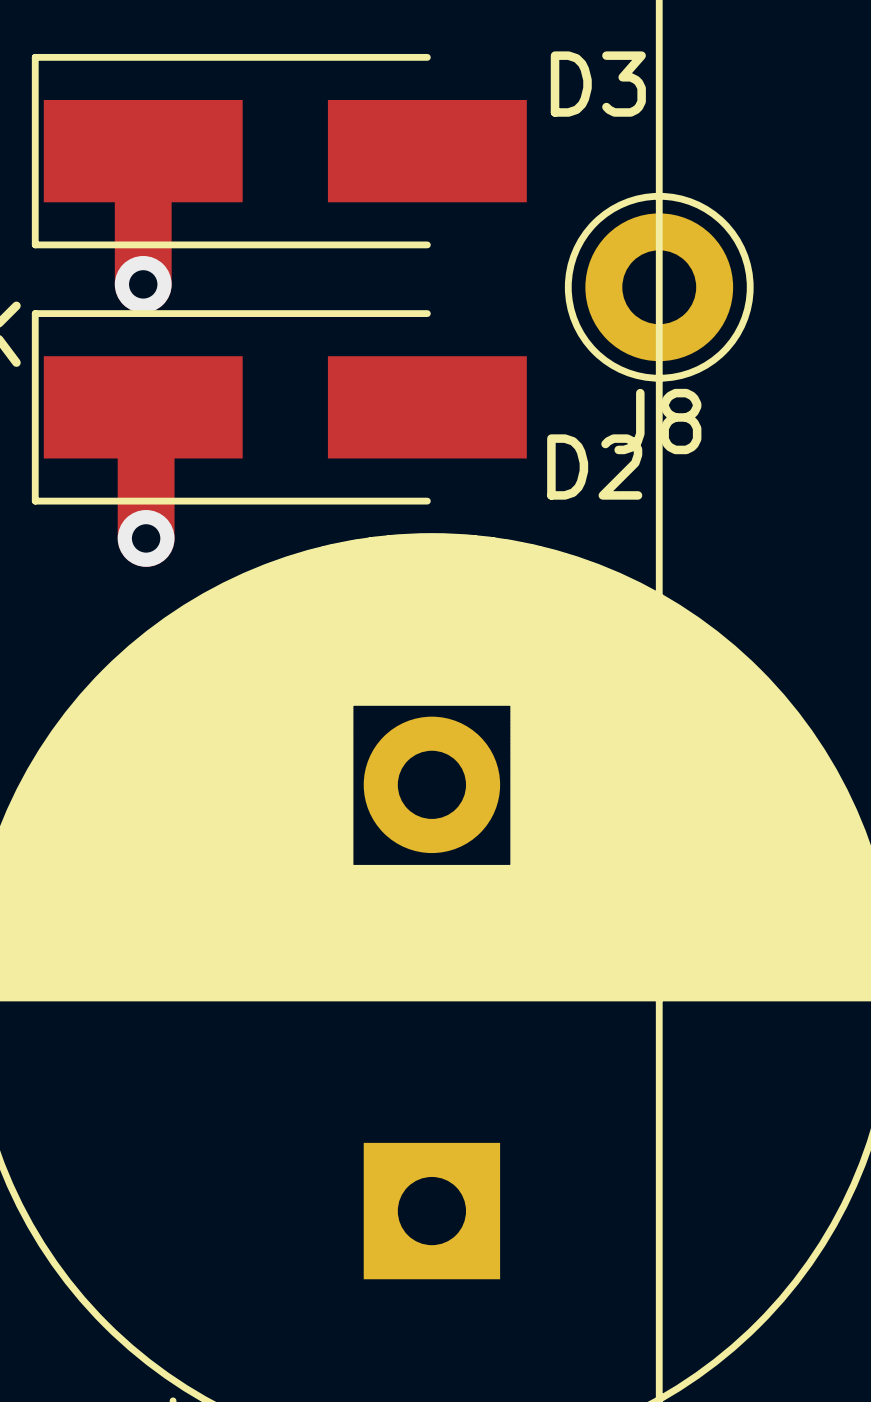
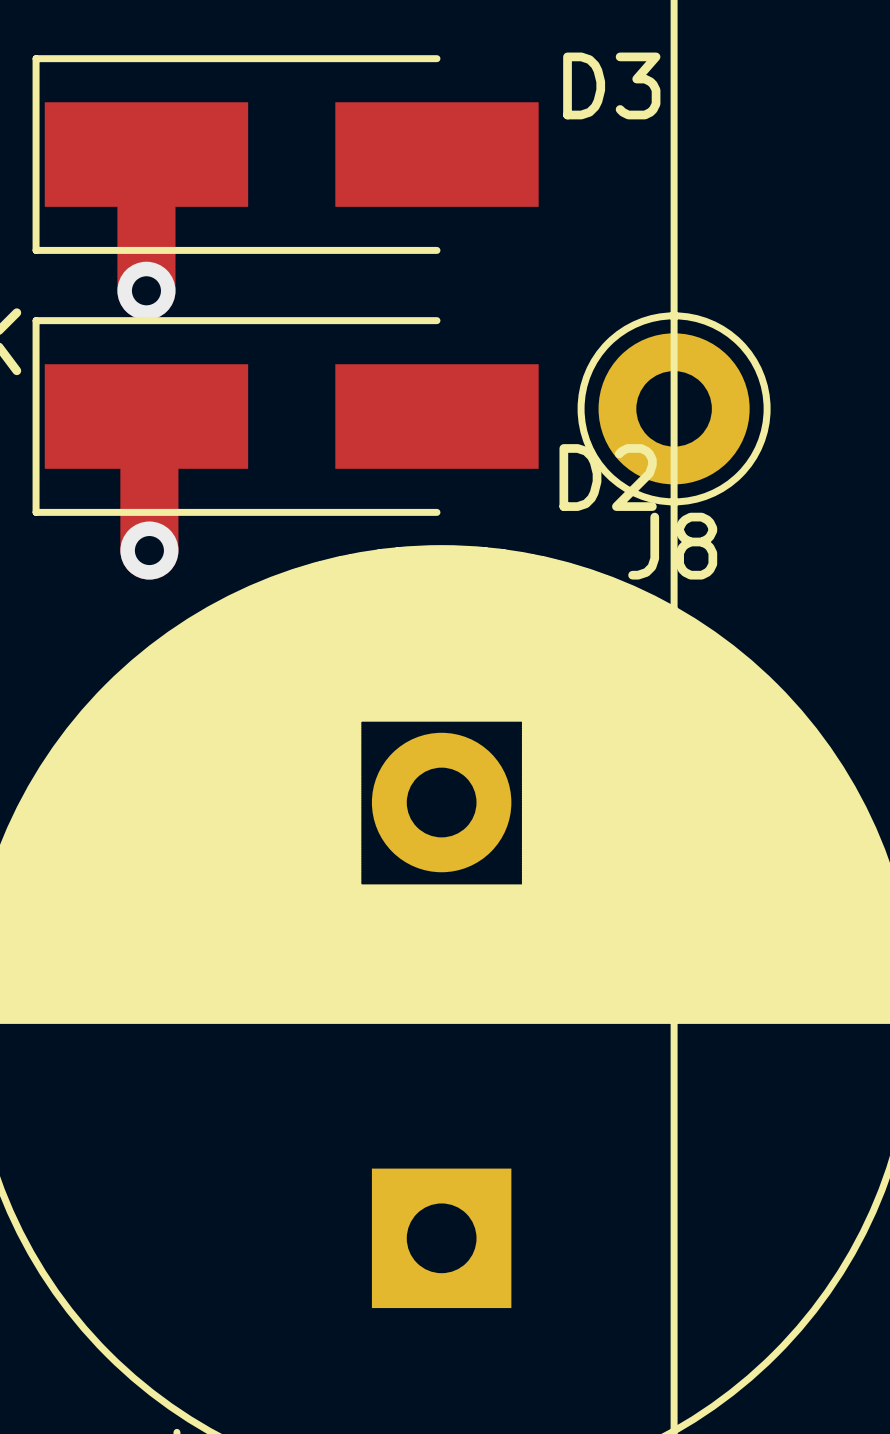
J8 position: (659, 287) -> (674, 408)

